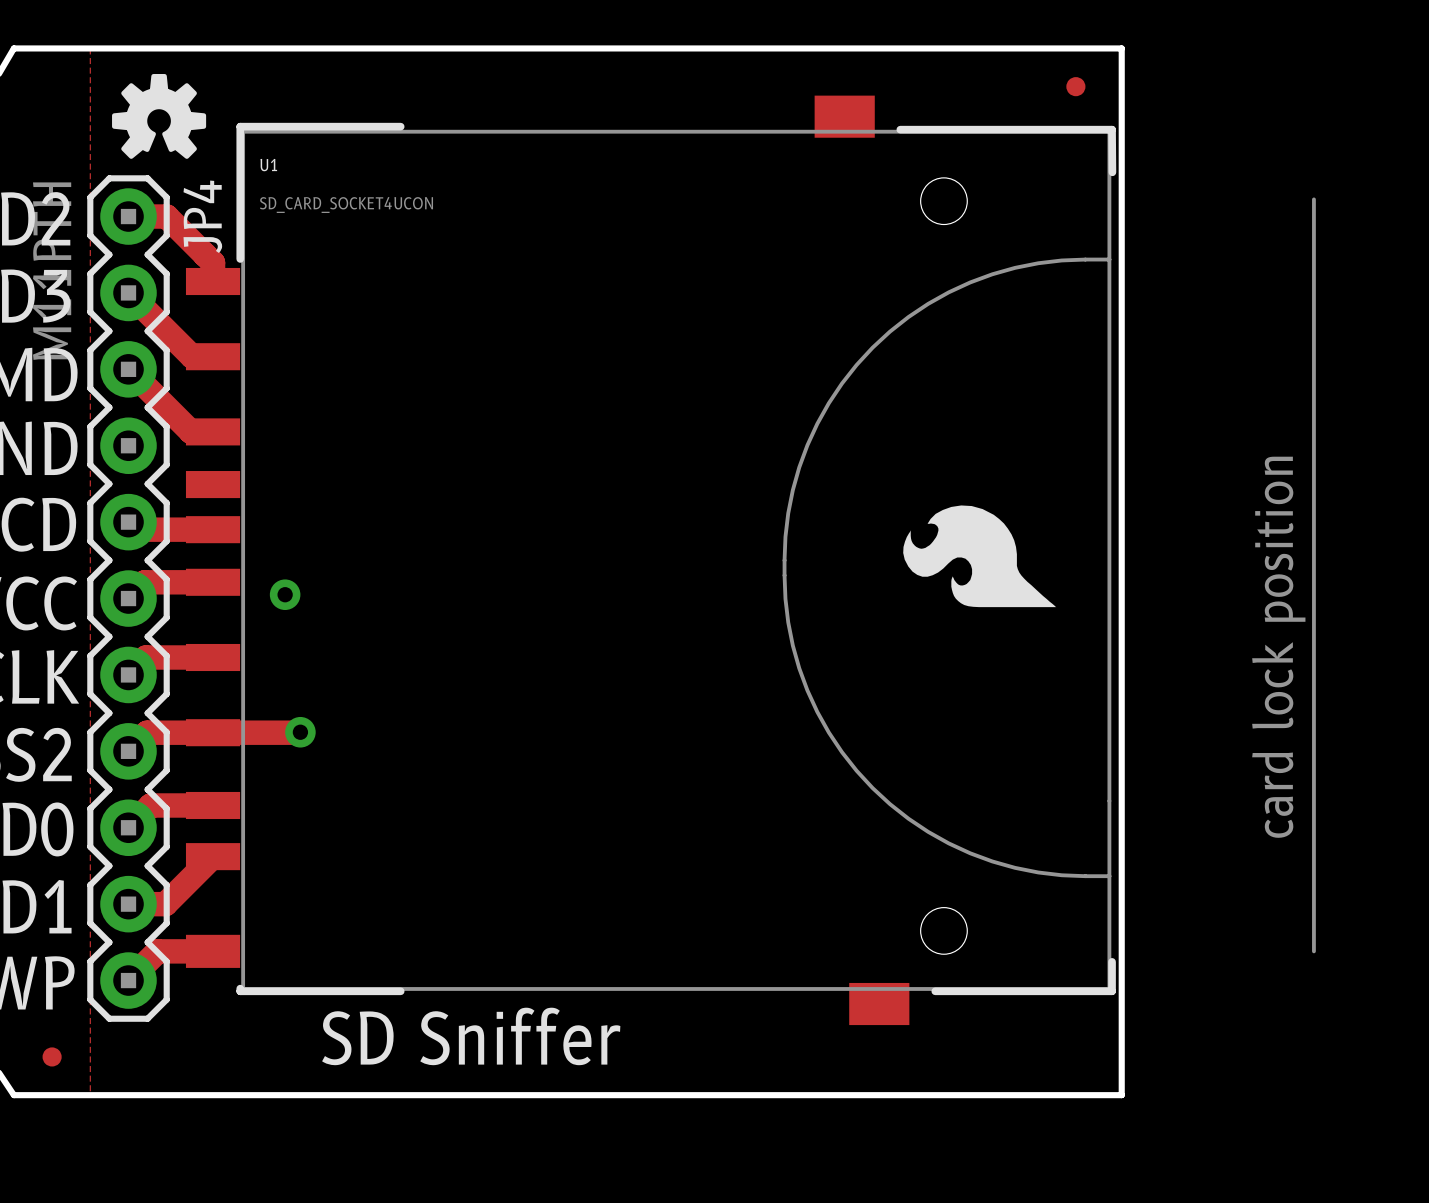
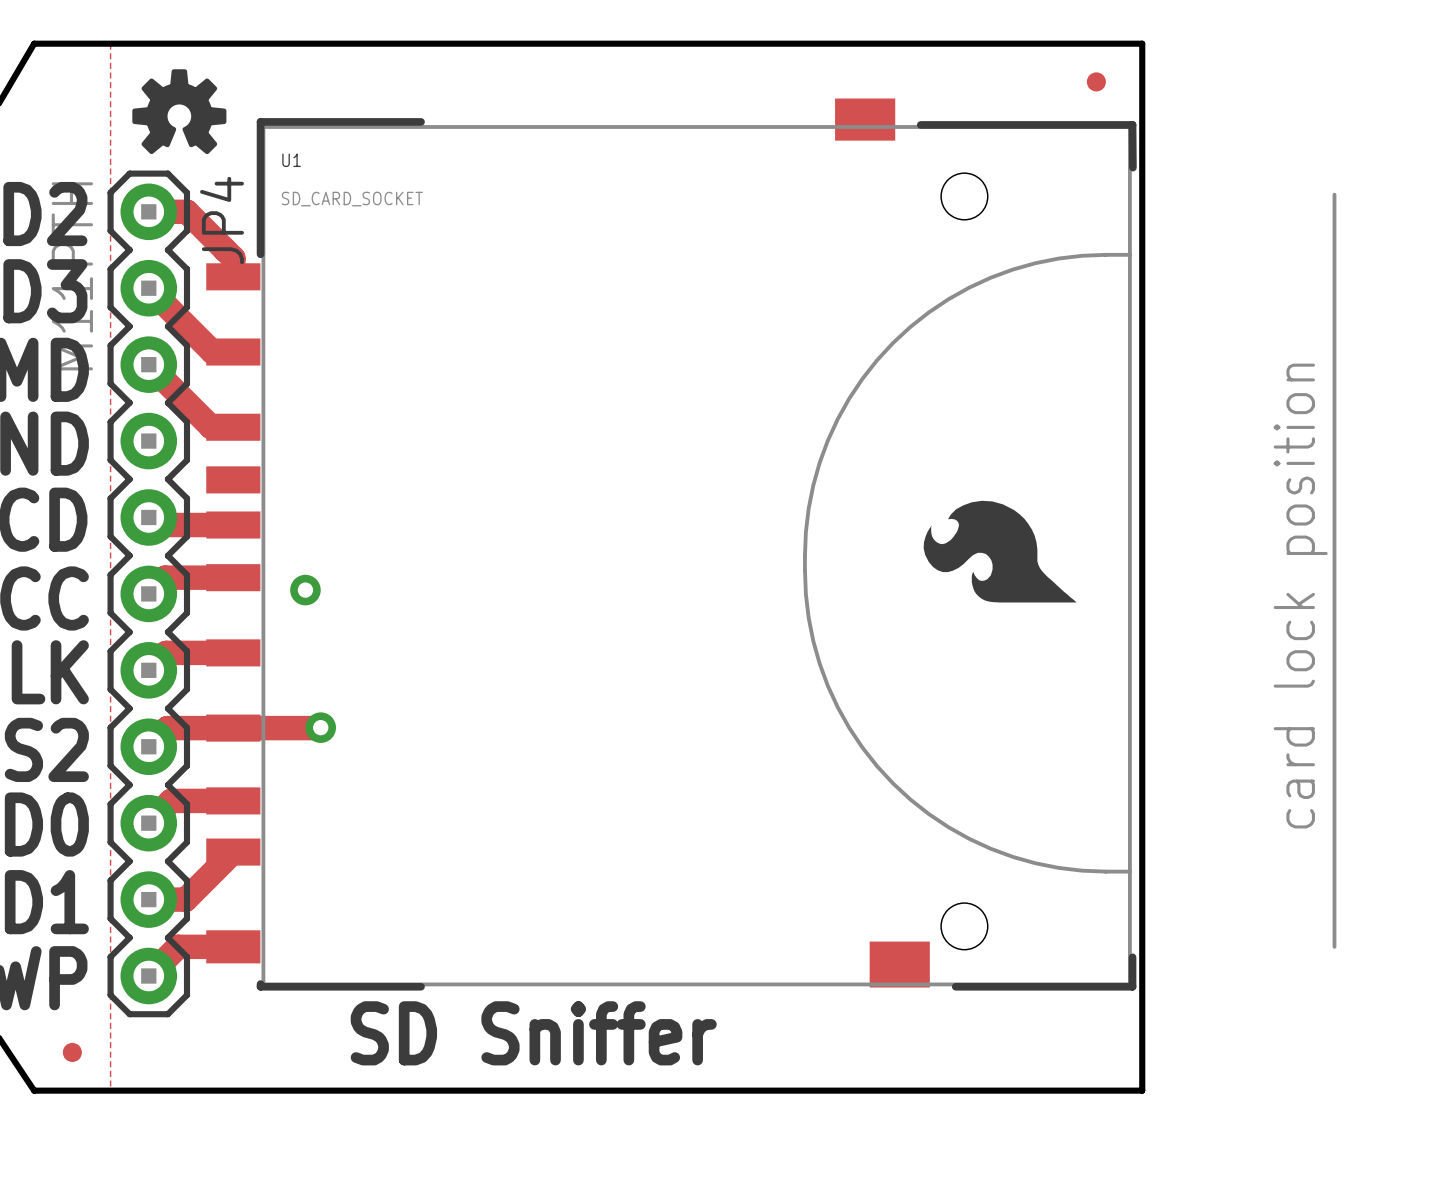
U1 footprint: [185, 95, 1316, 1026] -> [206, 98, 1337, 991]
U1 value: SD_CARD_SOCKET4UCON (346, 205) -> SD_CARD_SOCKET (352, 199)

